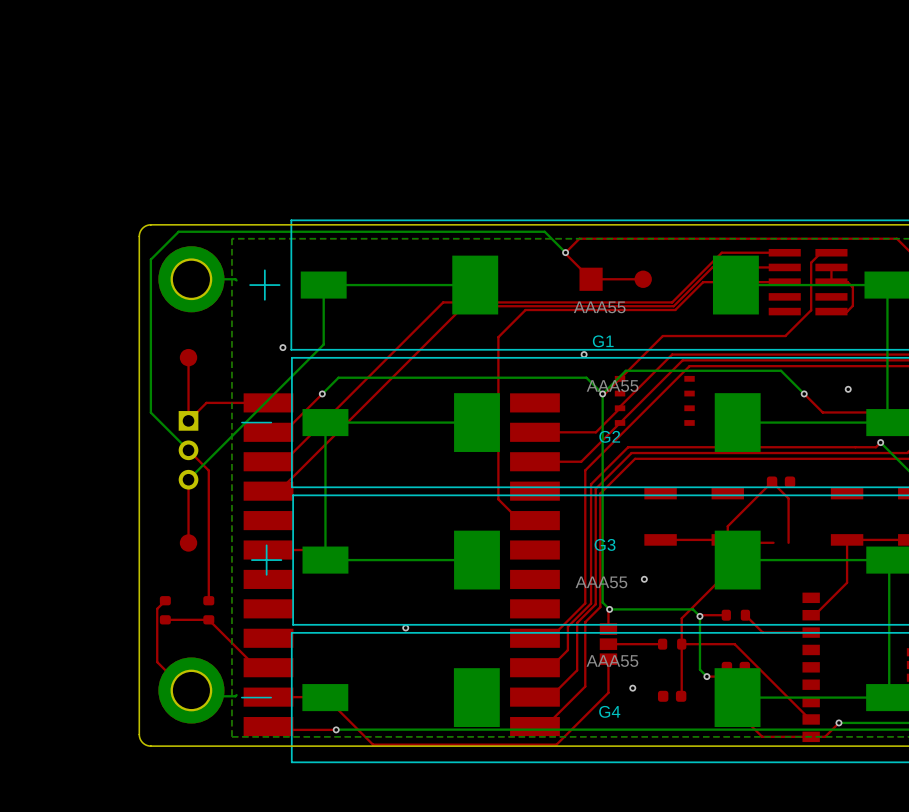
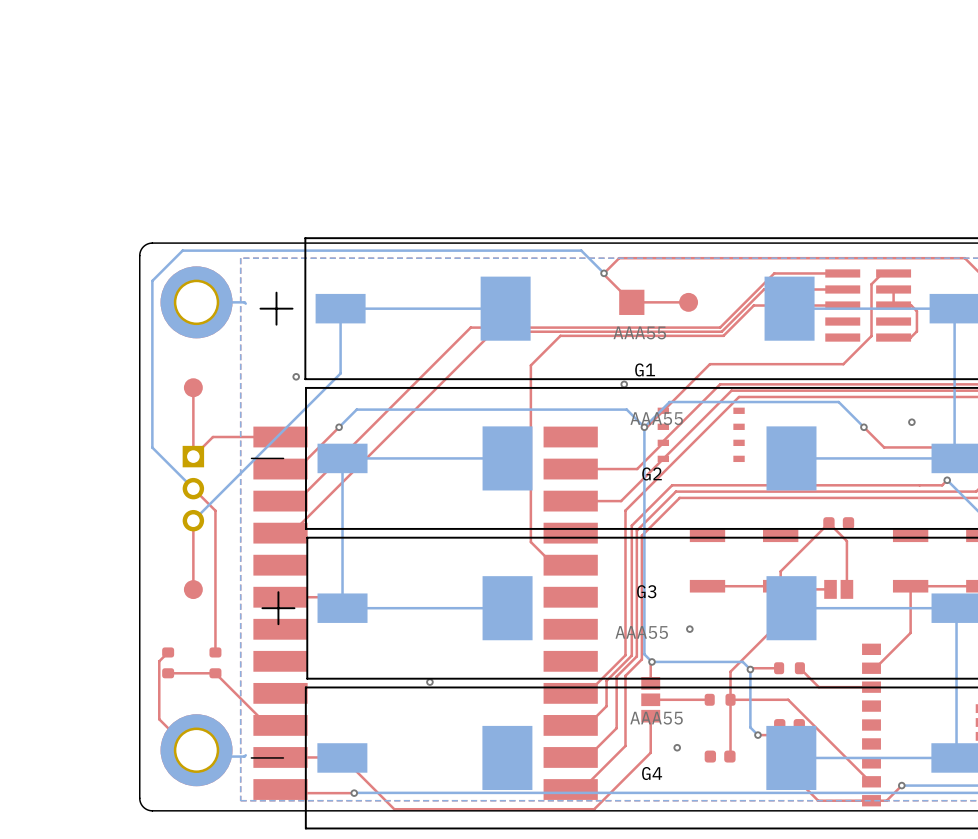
part: none -> (838, 589)

